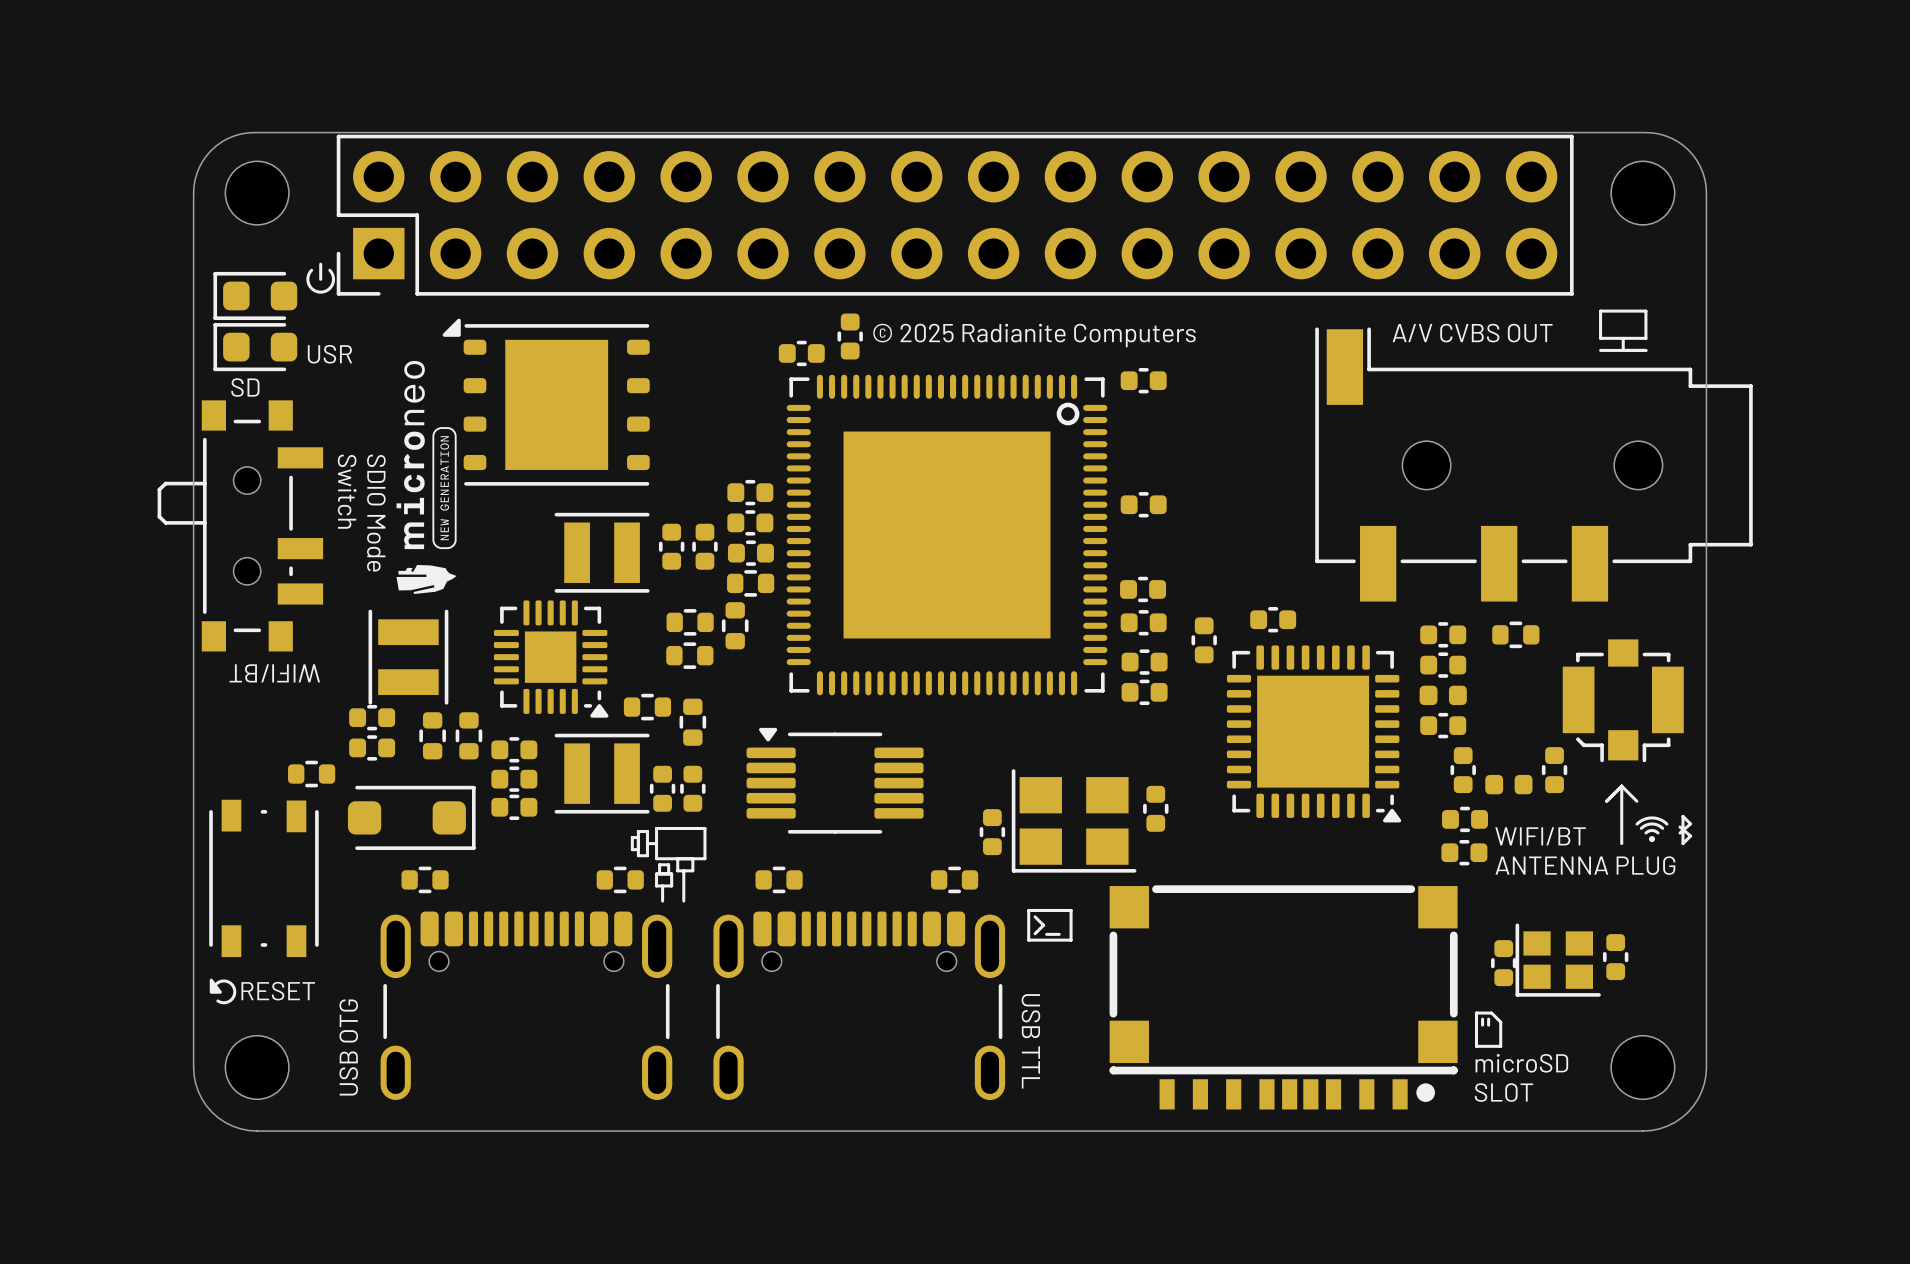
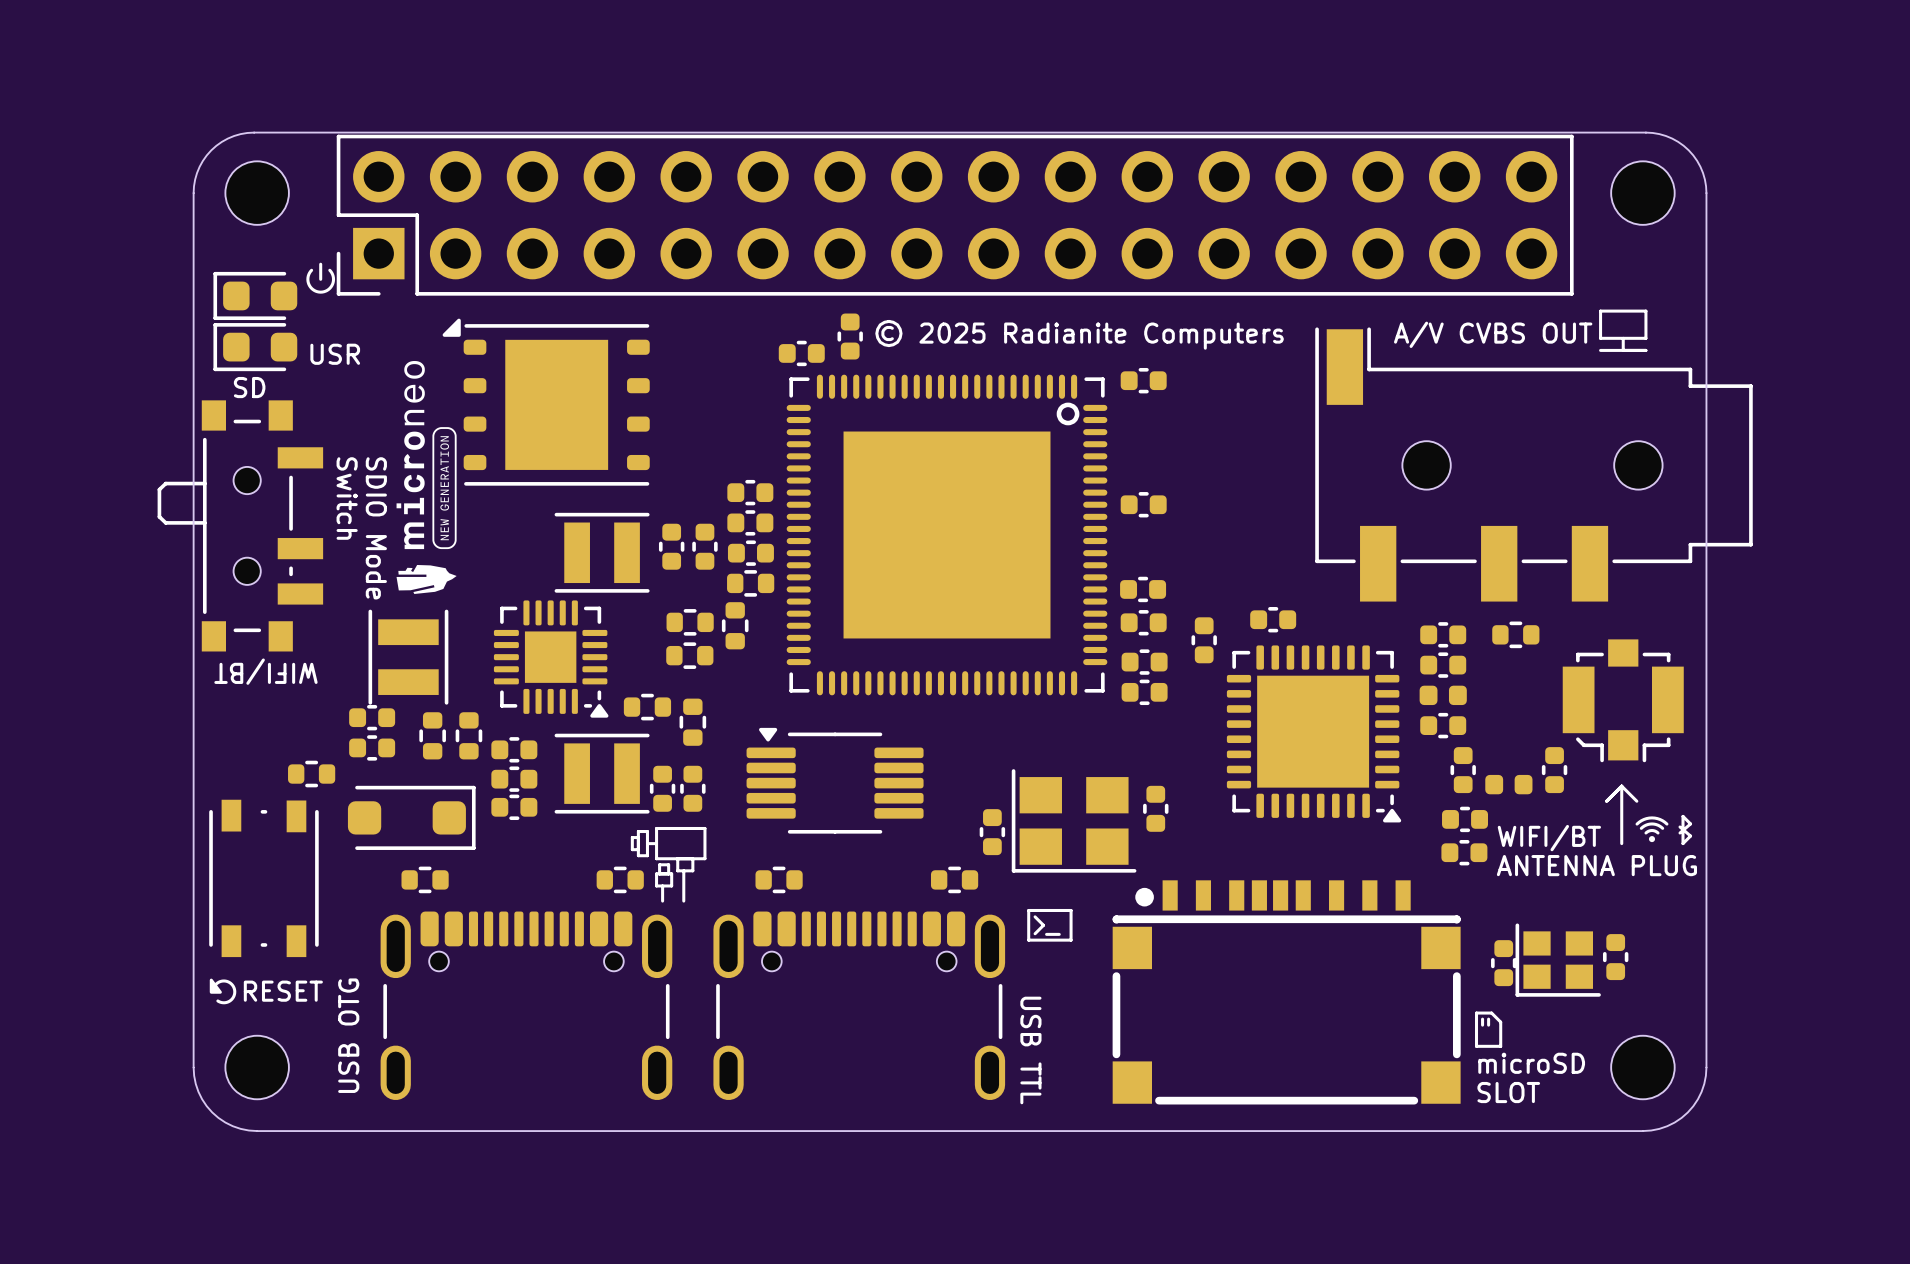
part rotation: 0° (1283, 997) -> 180° (1286, 992)

